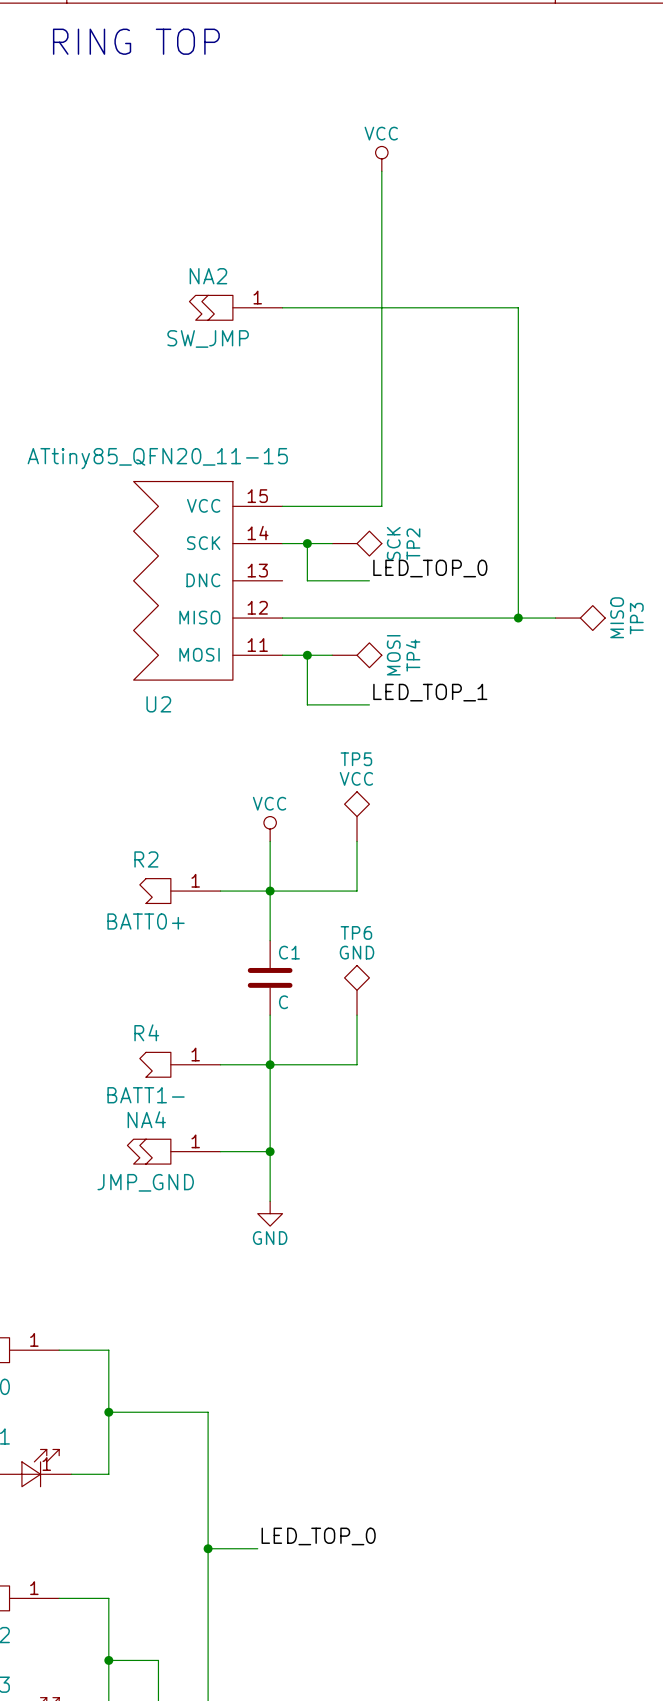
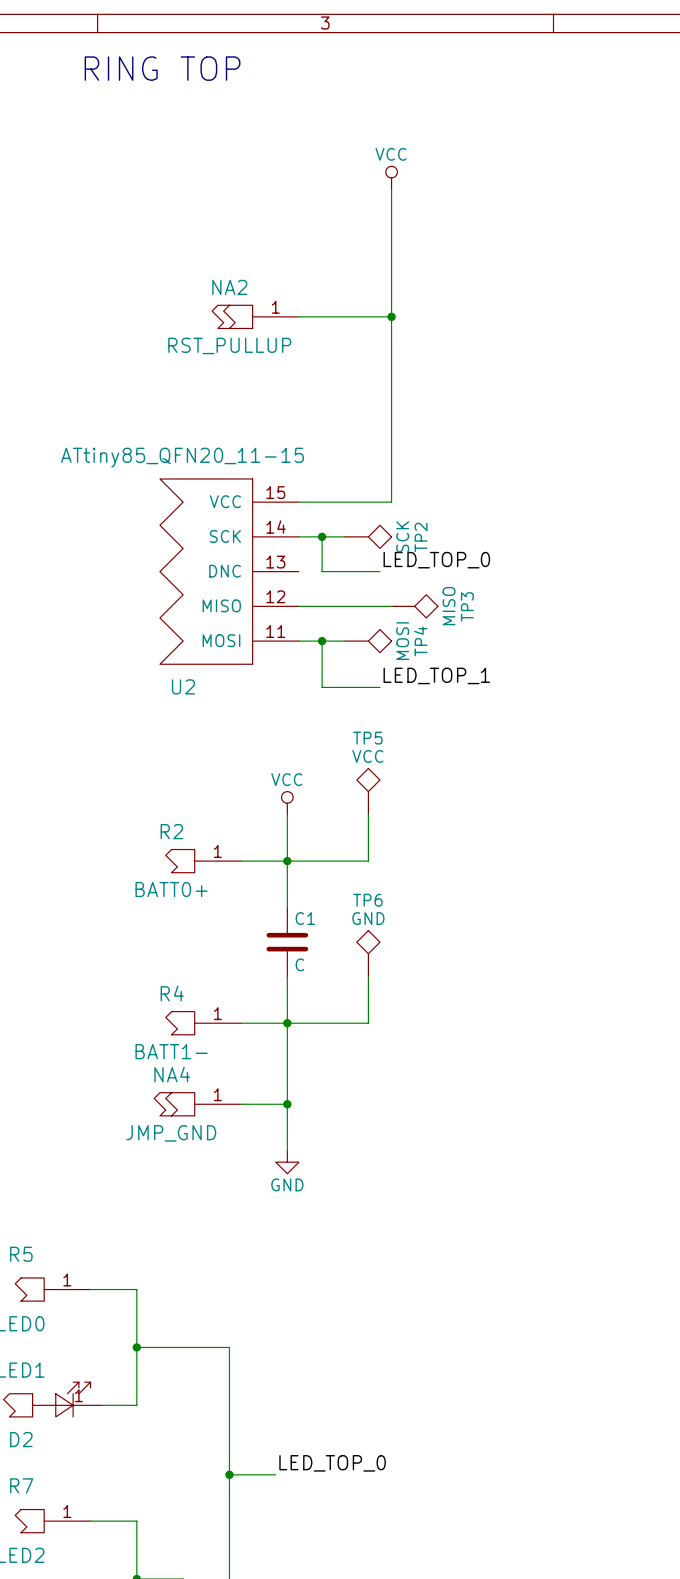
wire: (381, 307) (518, 307) (518, 618) -> none
junction: none -> (391, 316)
NA2 value: SW_JMP (208, 338) -> RST_PULLUP (229, 345)
wire: (381, 618) (555, 618) -> none
junction: (518, 618) -> none
TP3 position: (580, 618) -> (414, 606)

